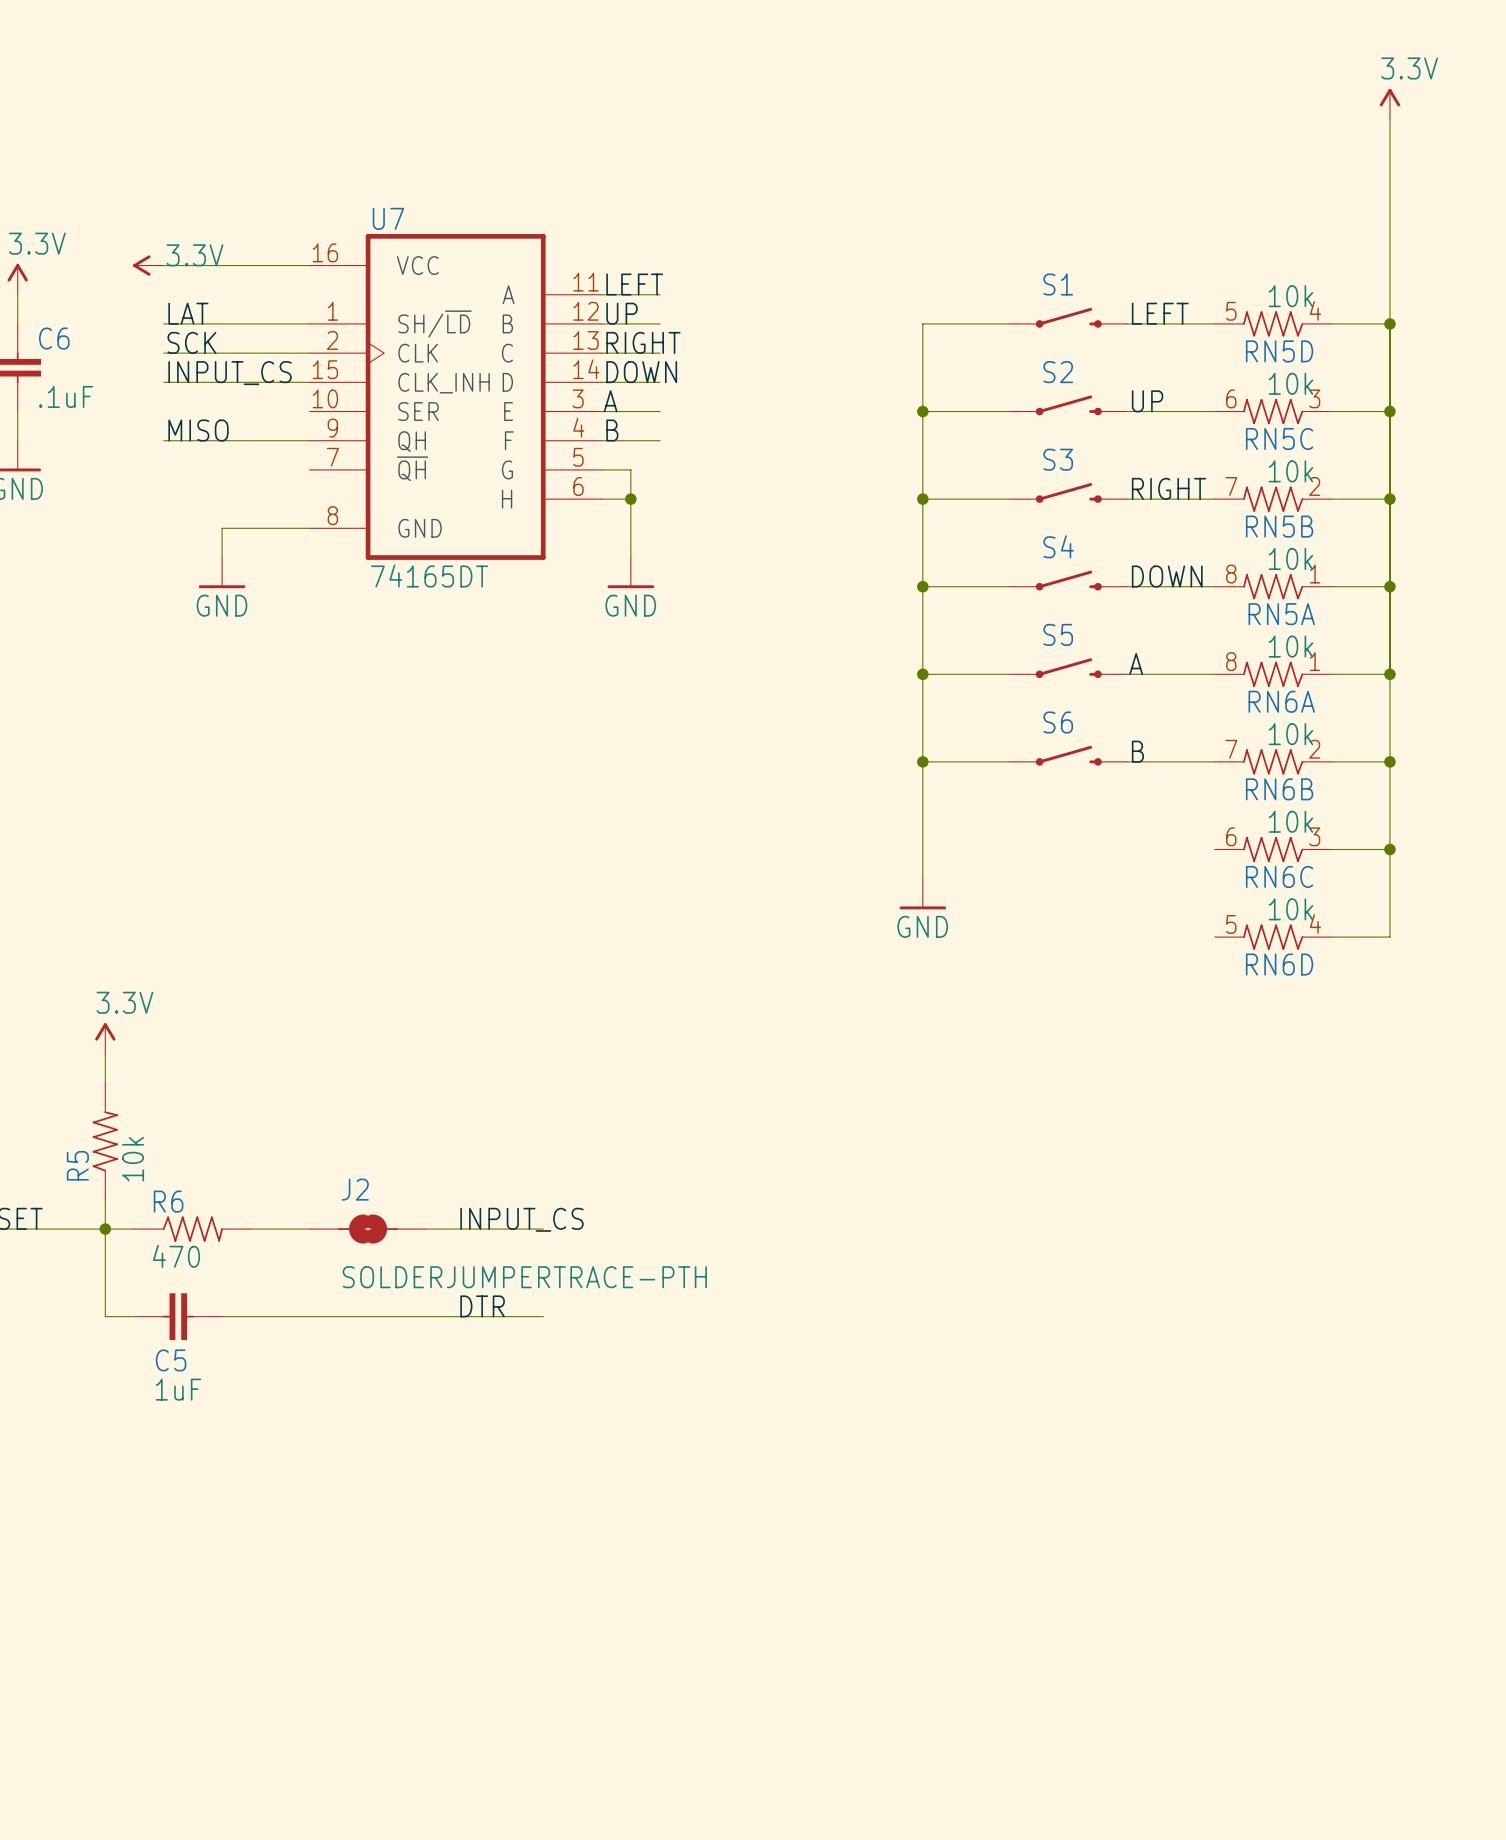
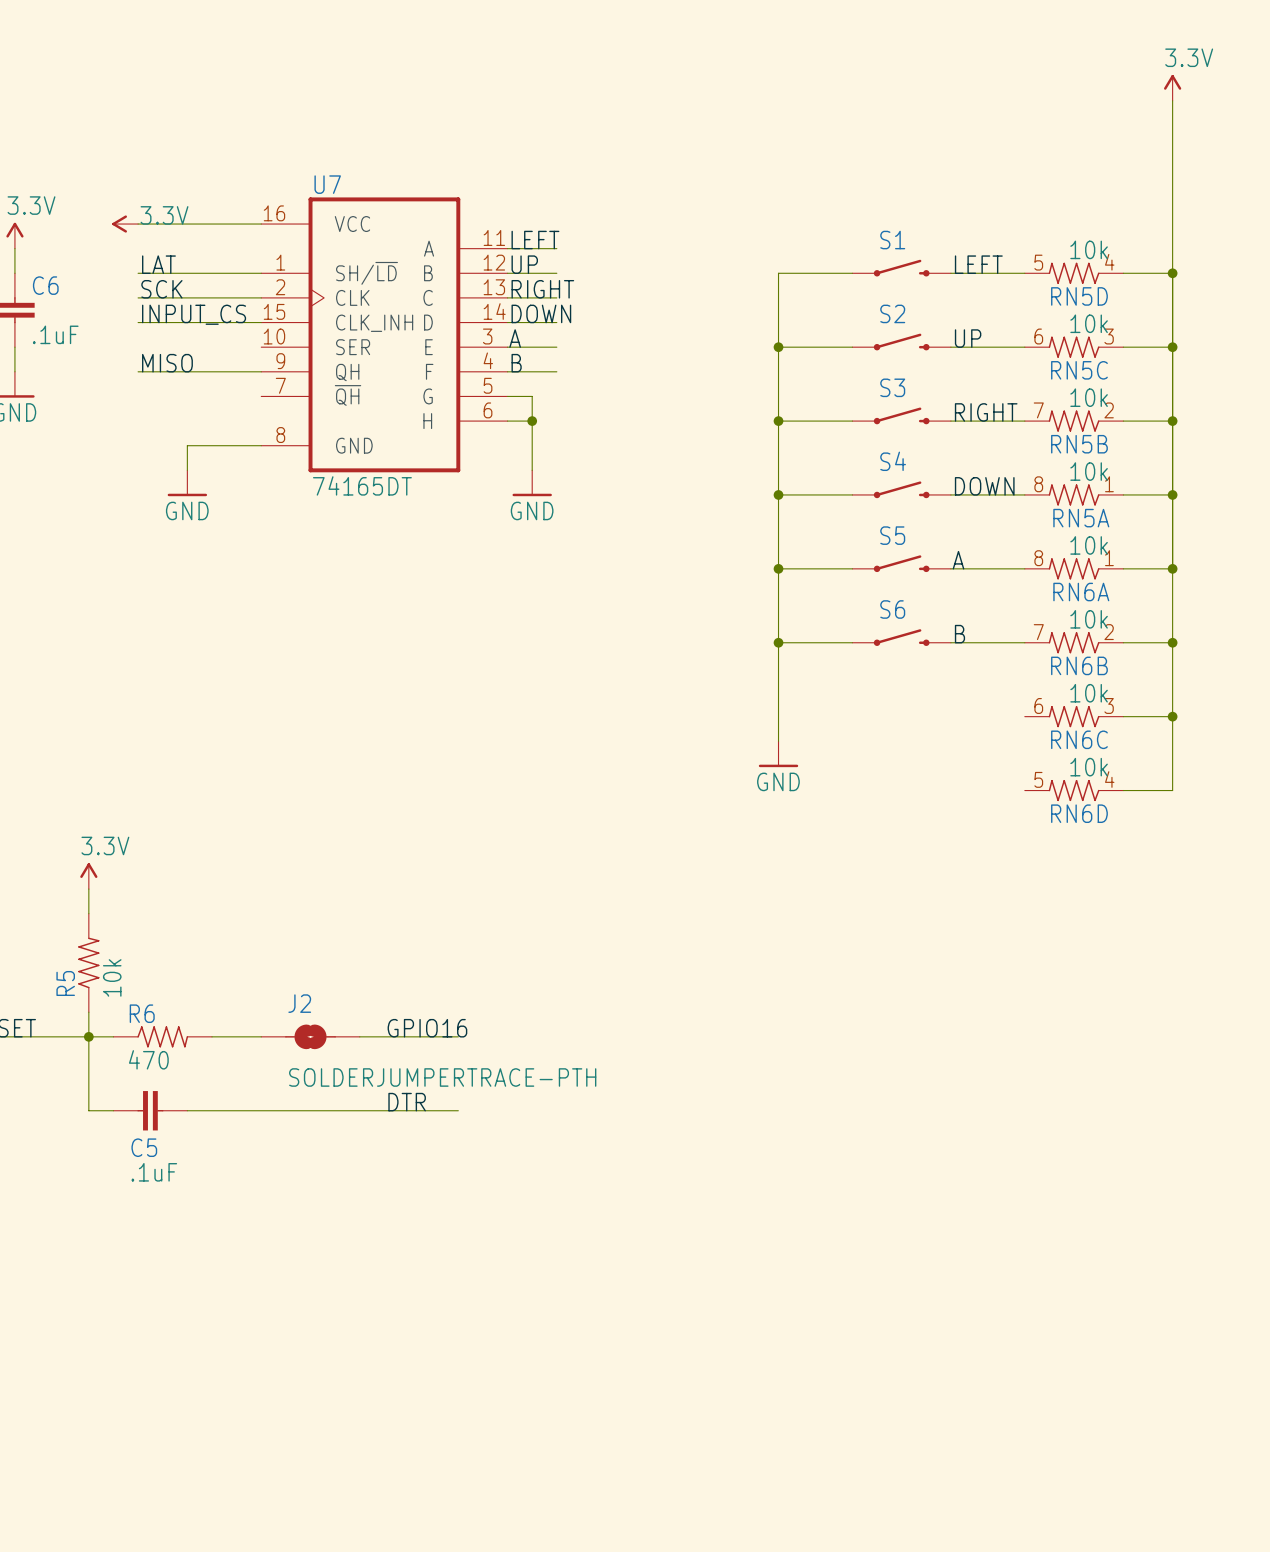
label: INPUT_CS (522, 1219) -> GPIO16 (427, 1028)
C5 value: 1uF (178, 1389) -> .1uF (154, 1172)

